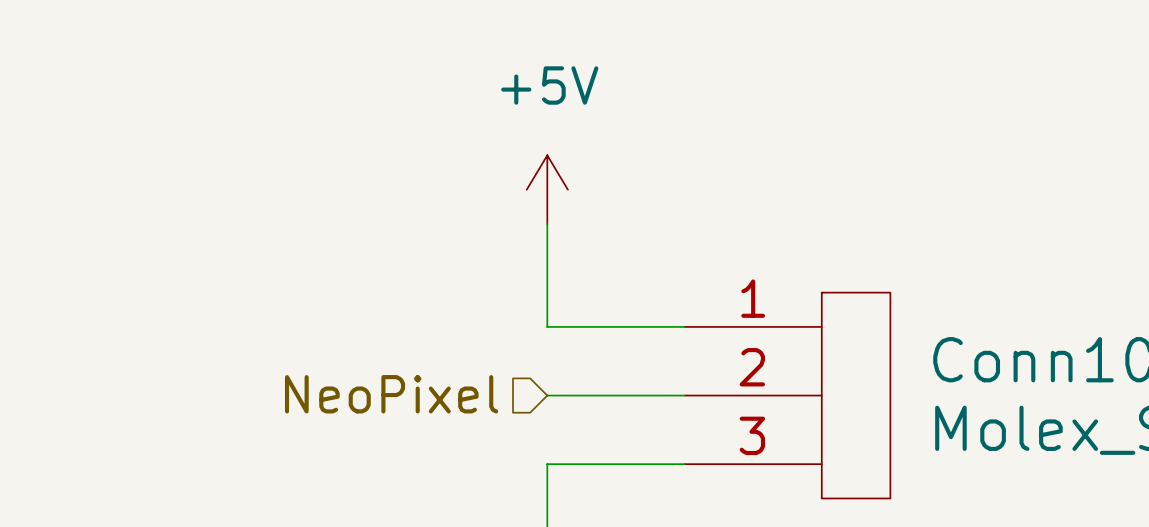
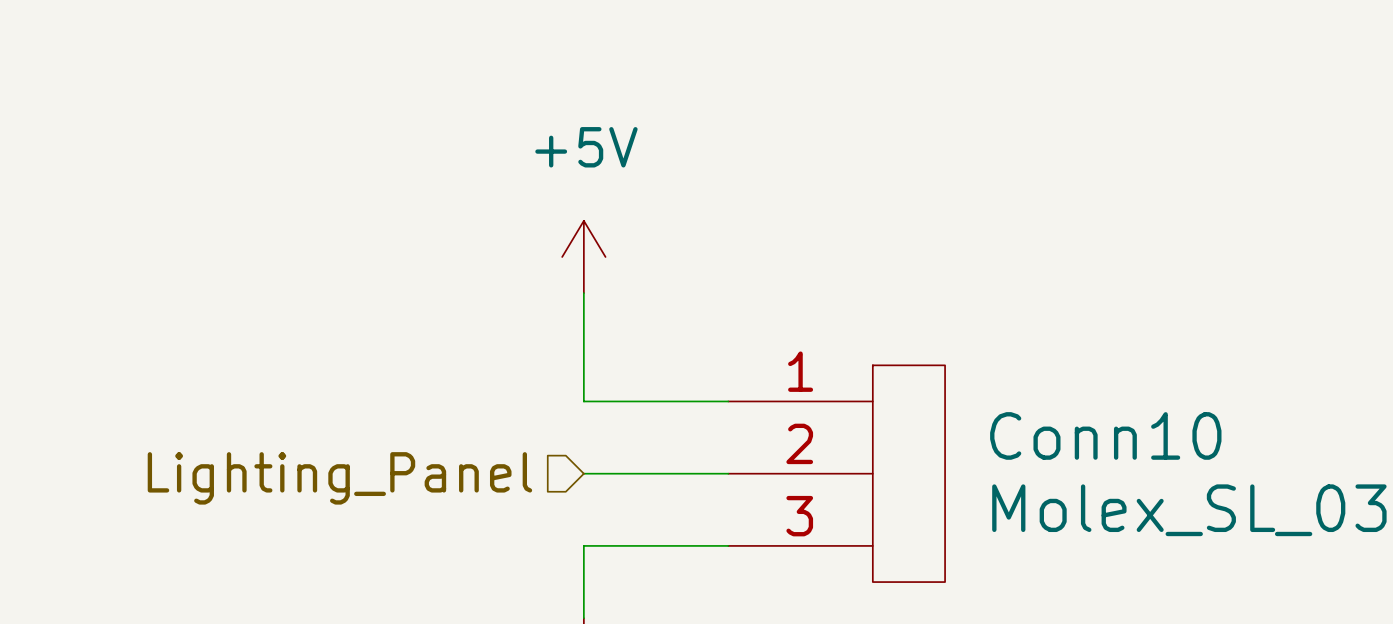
hierarchical label: NeoPixel (391, 394) -> Lighting_Panel (339, 478)

